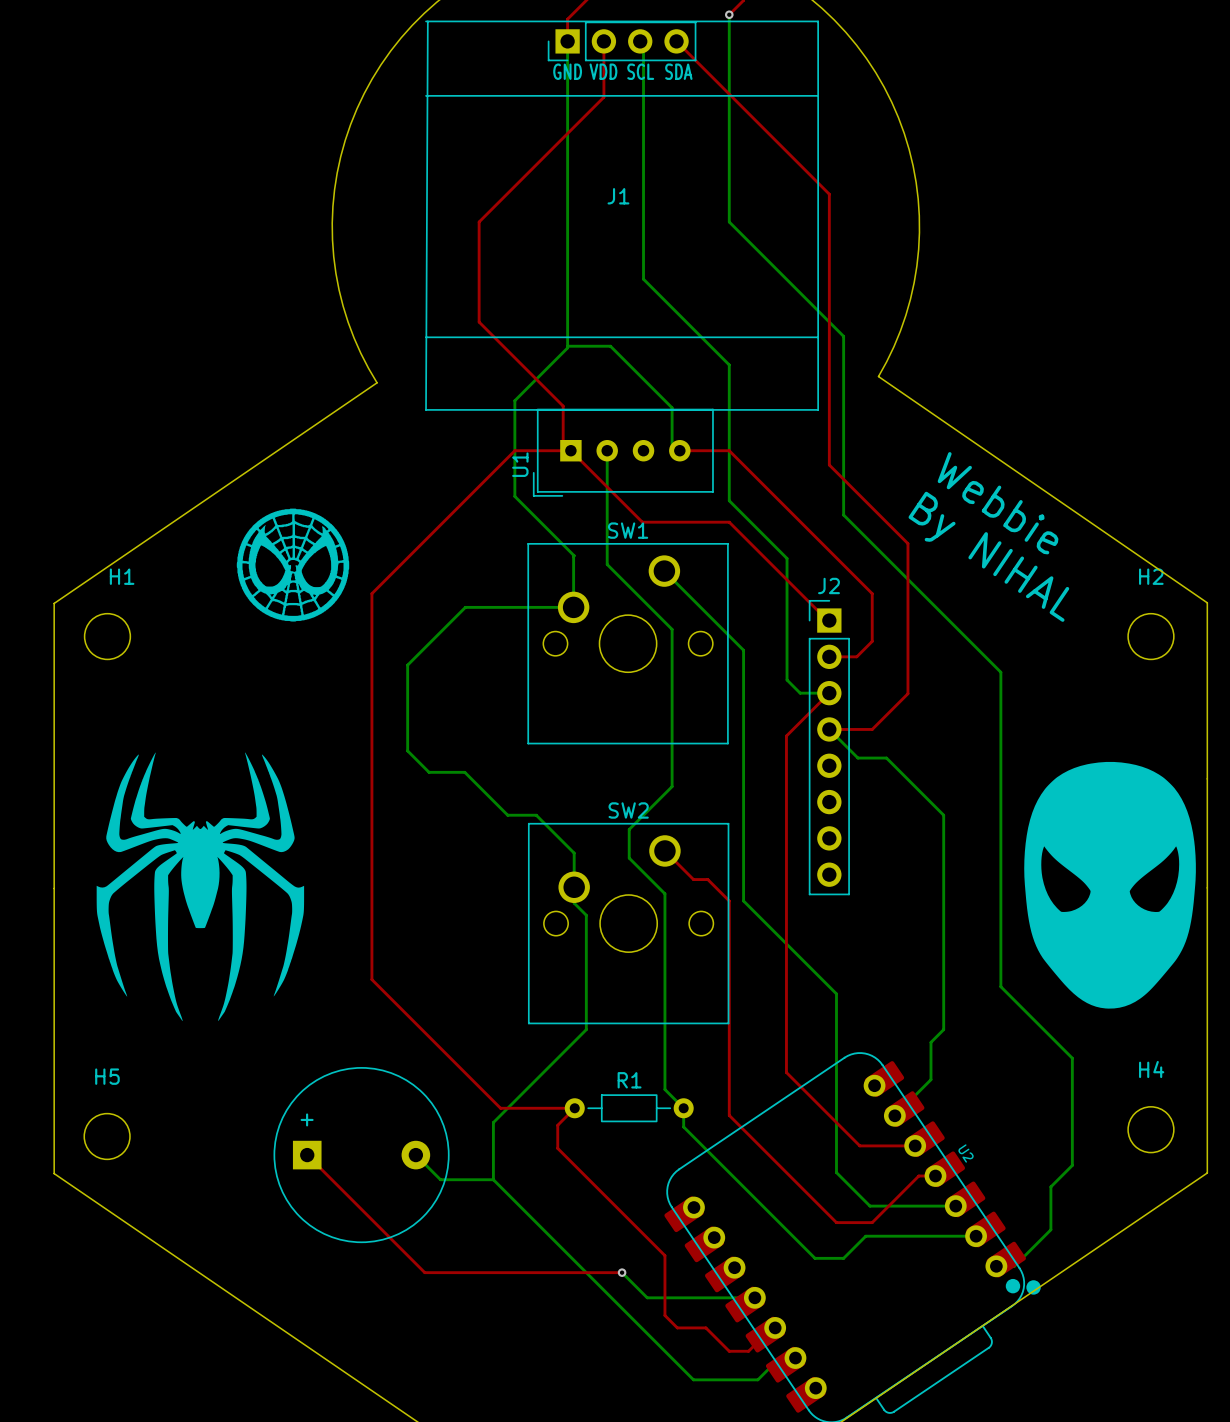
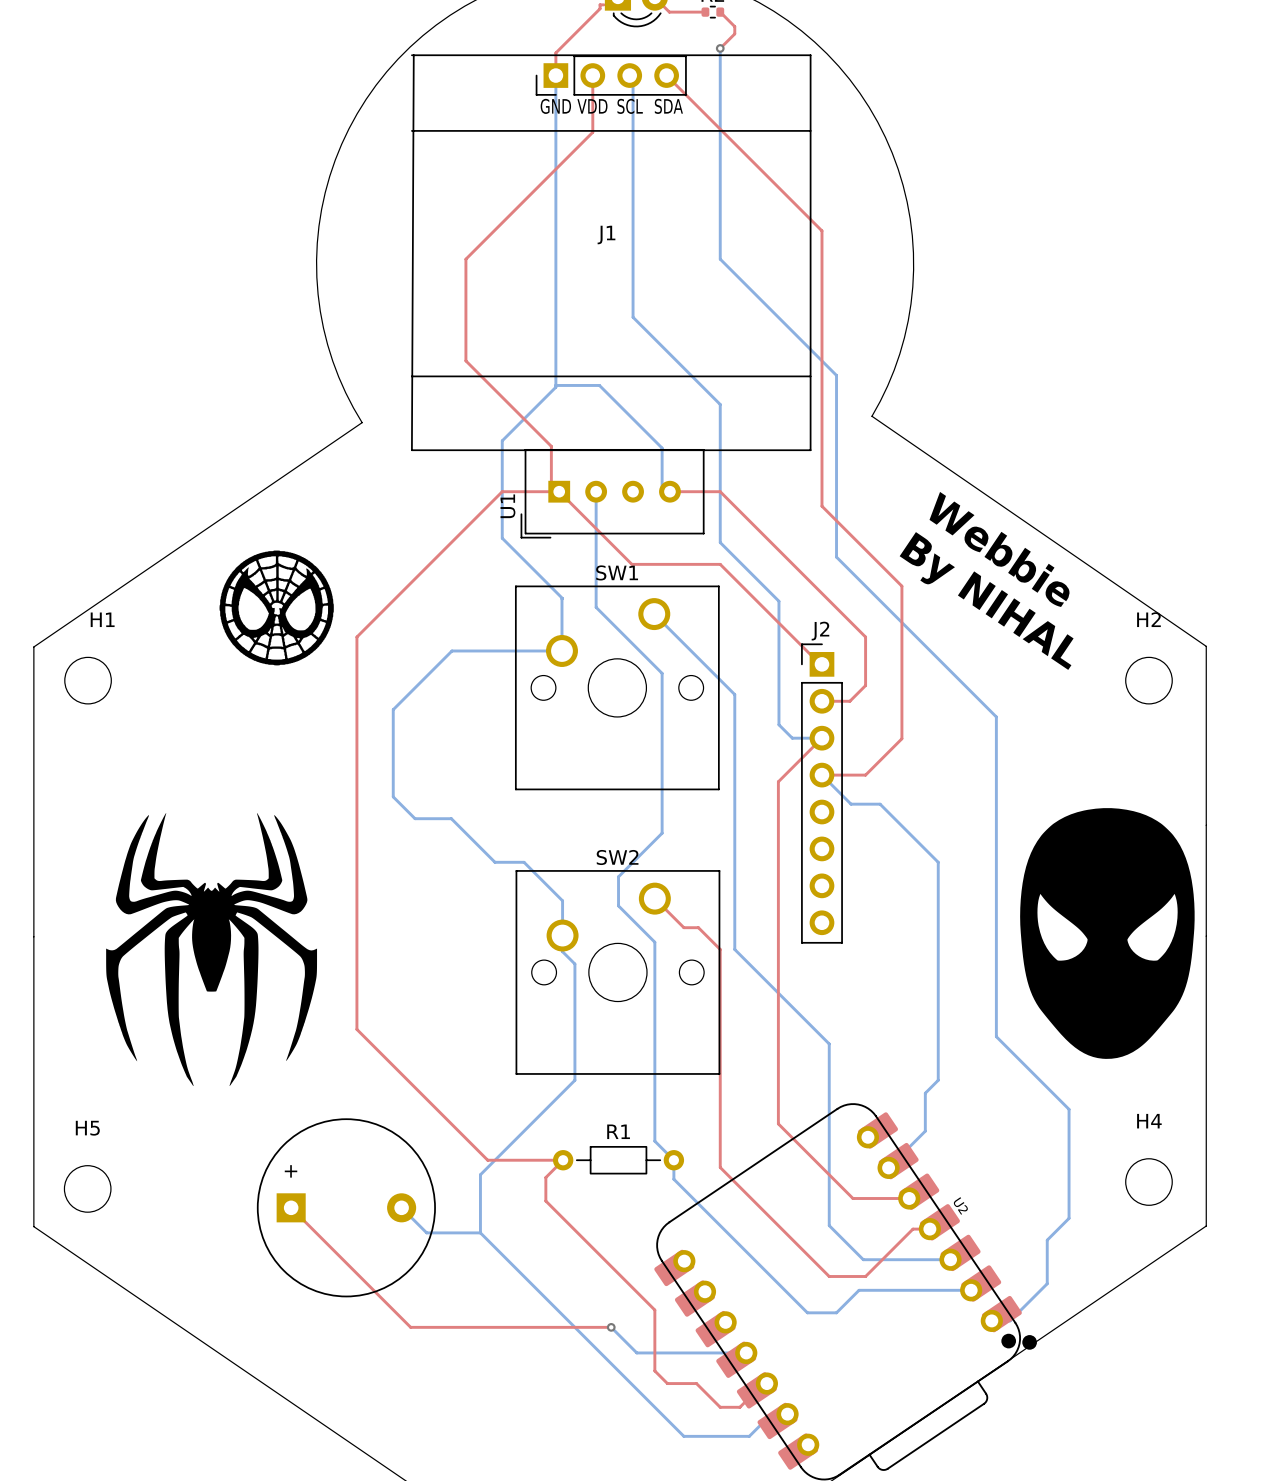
drawing position: (200, 886) -> (211, 949)

